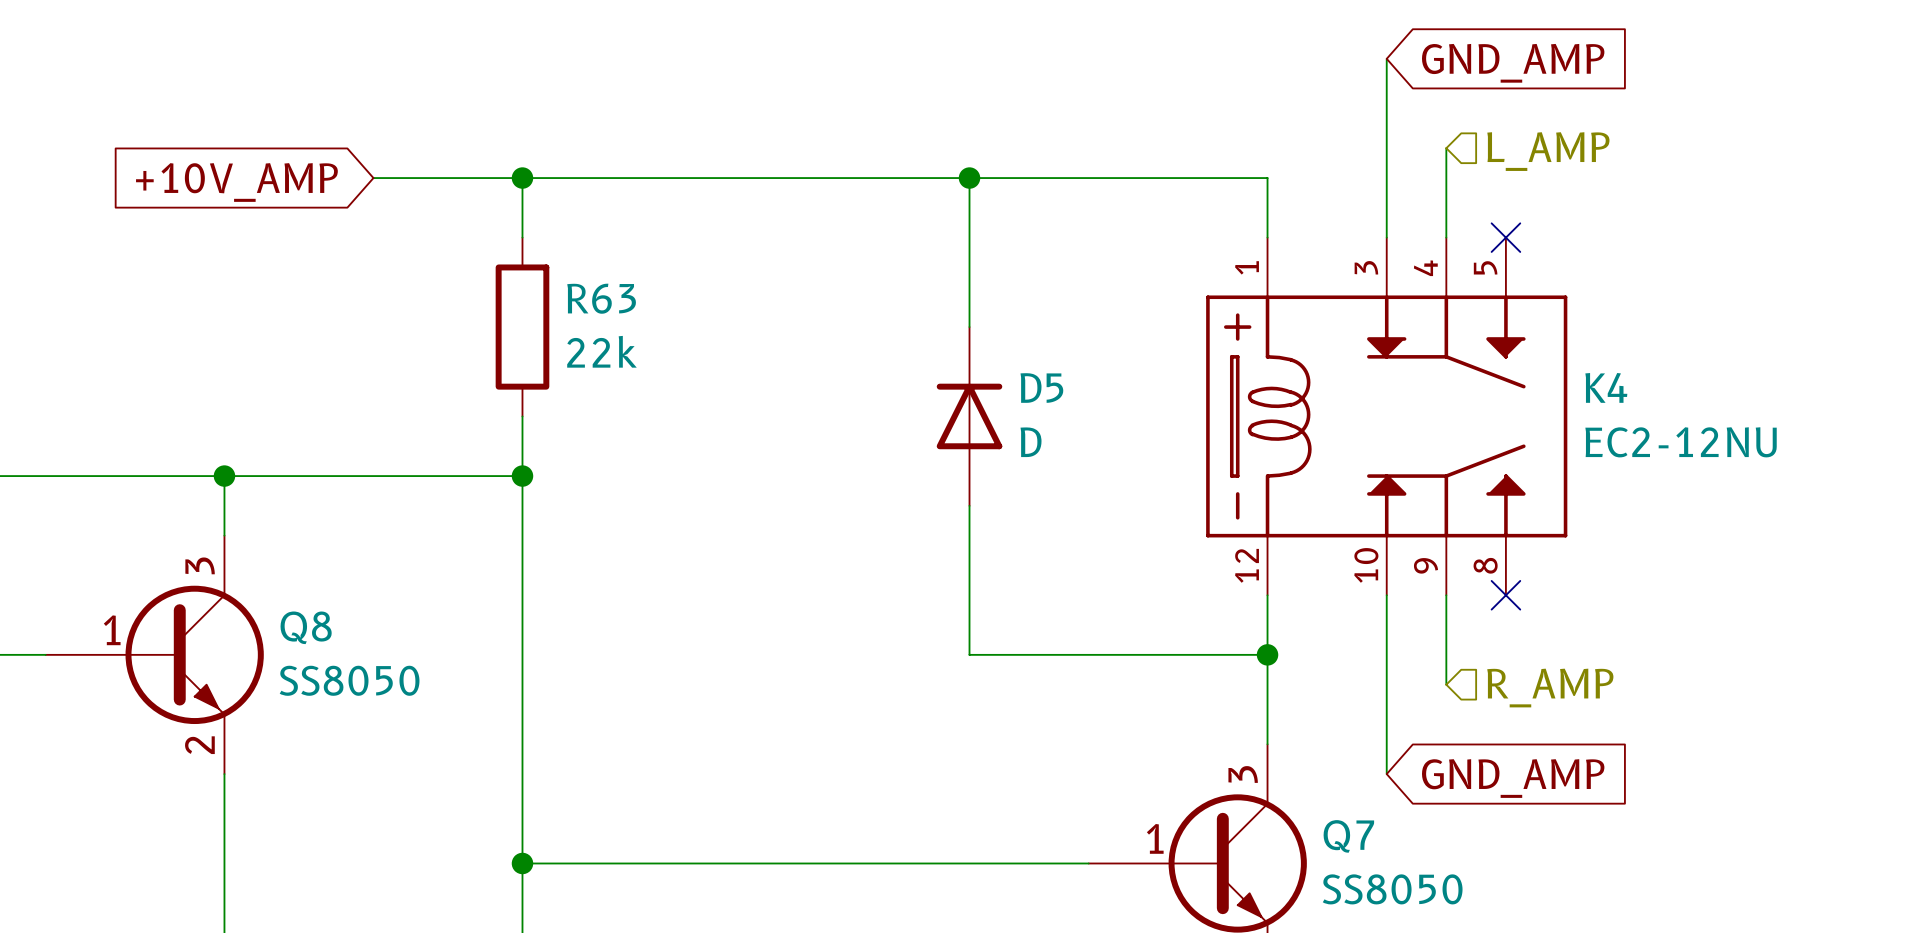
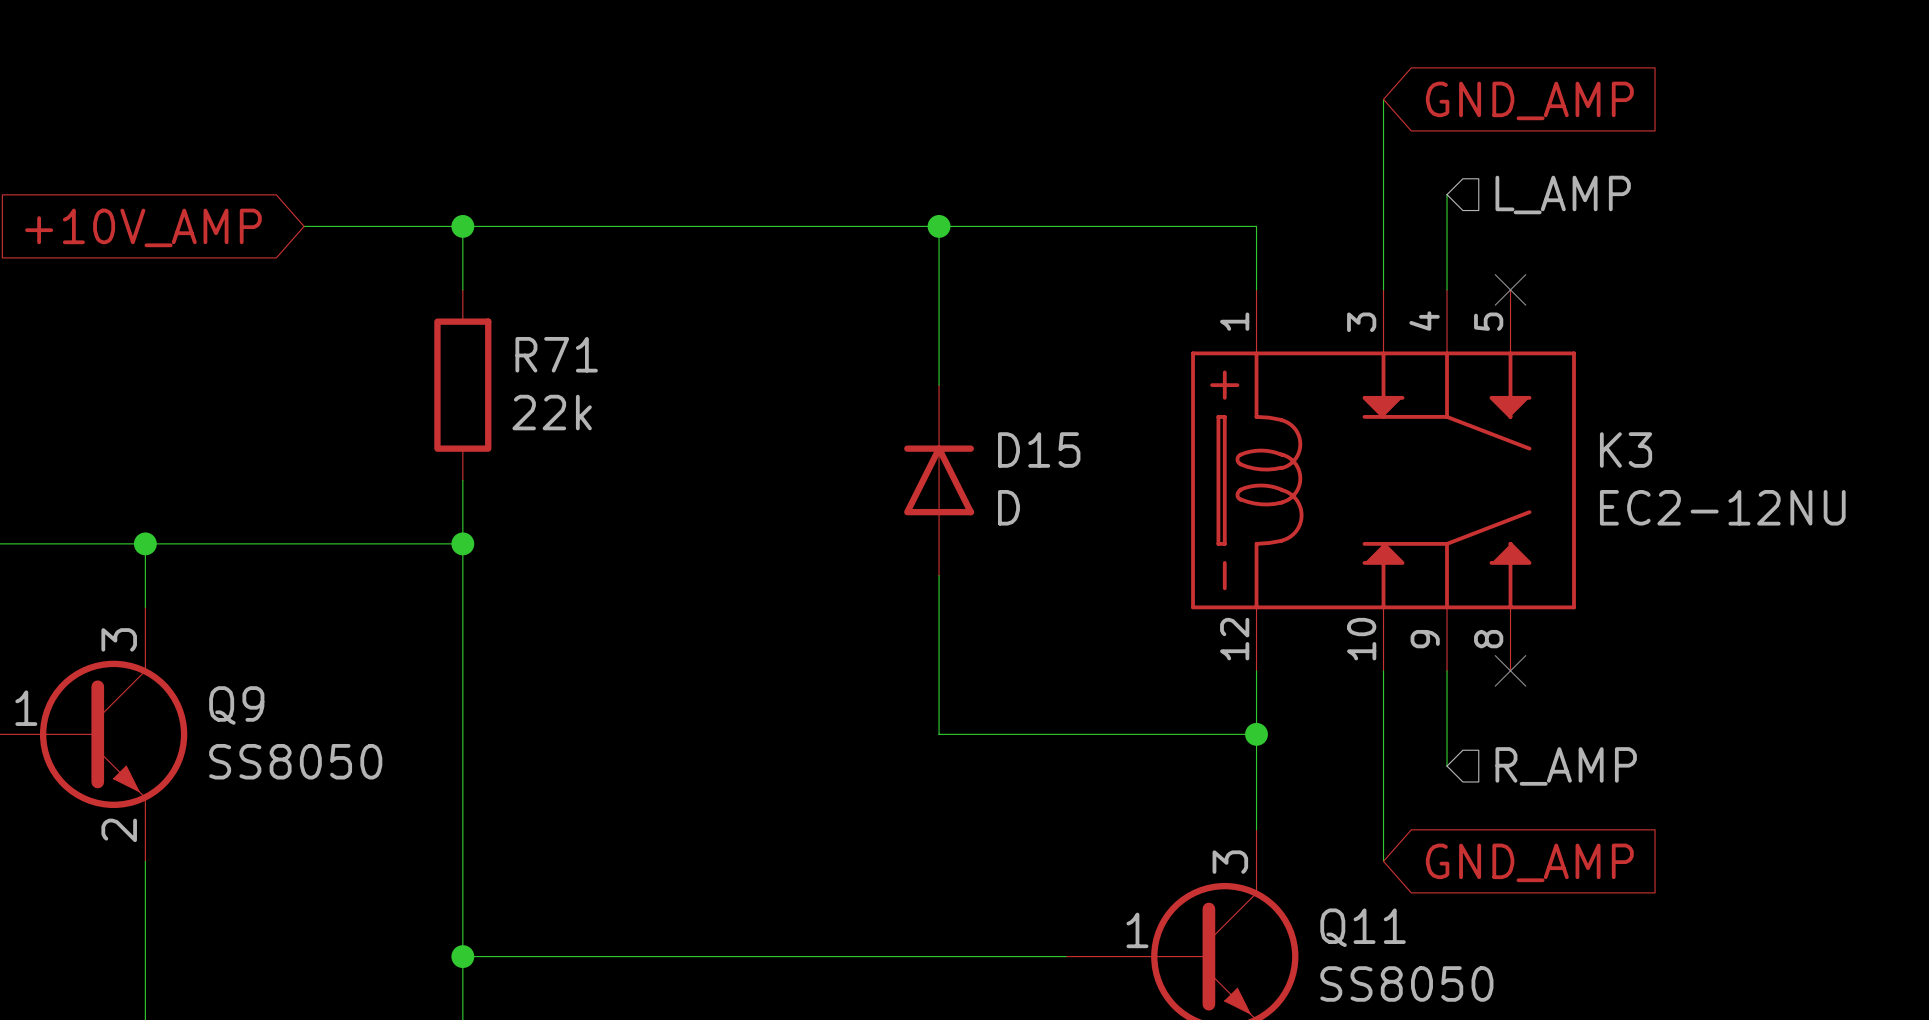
R63 name: R63 (601, 298) -> R71 (556, 354)
K4 name: K4 (1606, 387) -> K3 (1626, 449)
D5 name: D5 (1041, 388) -> D15 (1039, 449)
Q8 name: Q8 (306, 627) -> Q9 (236, 705)
Q7 name: Q7 (1348, 836) -> Q11 (1363, 927)

